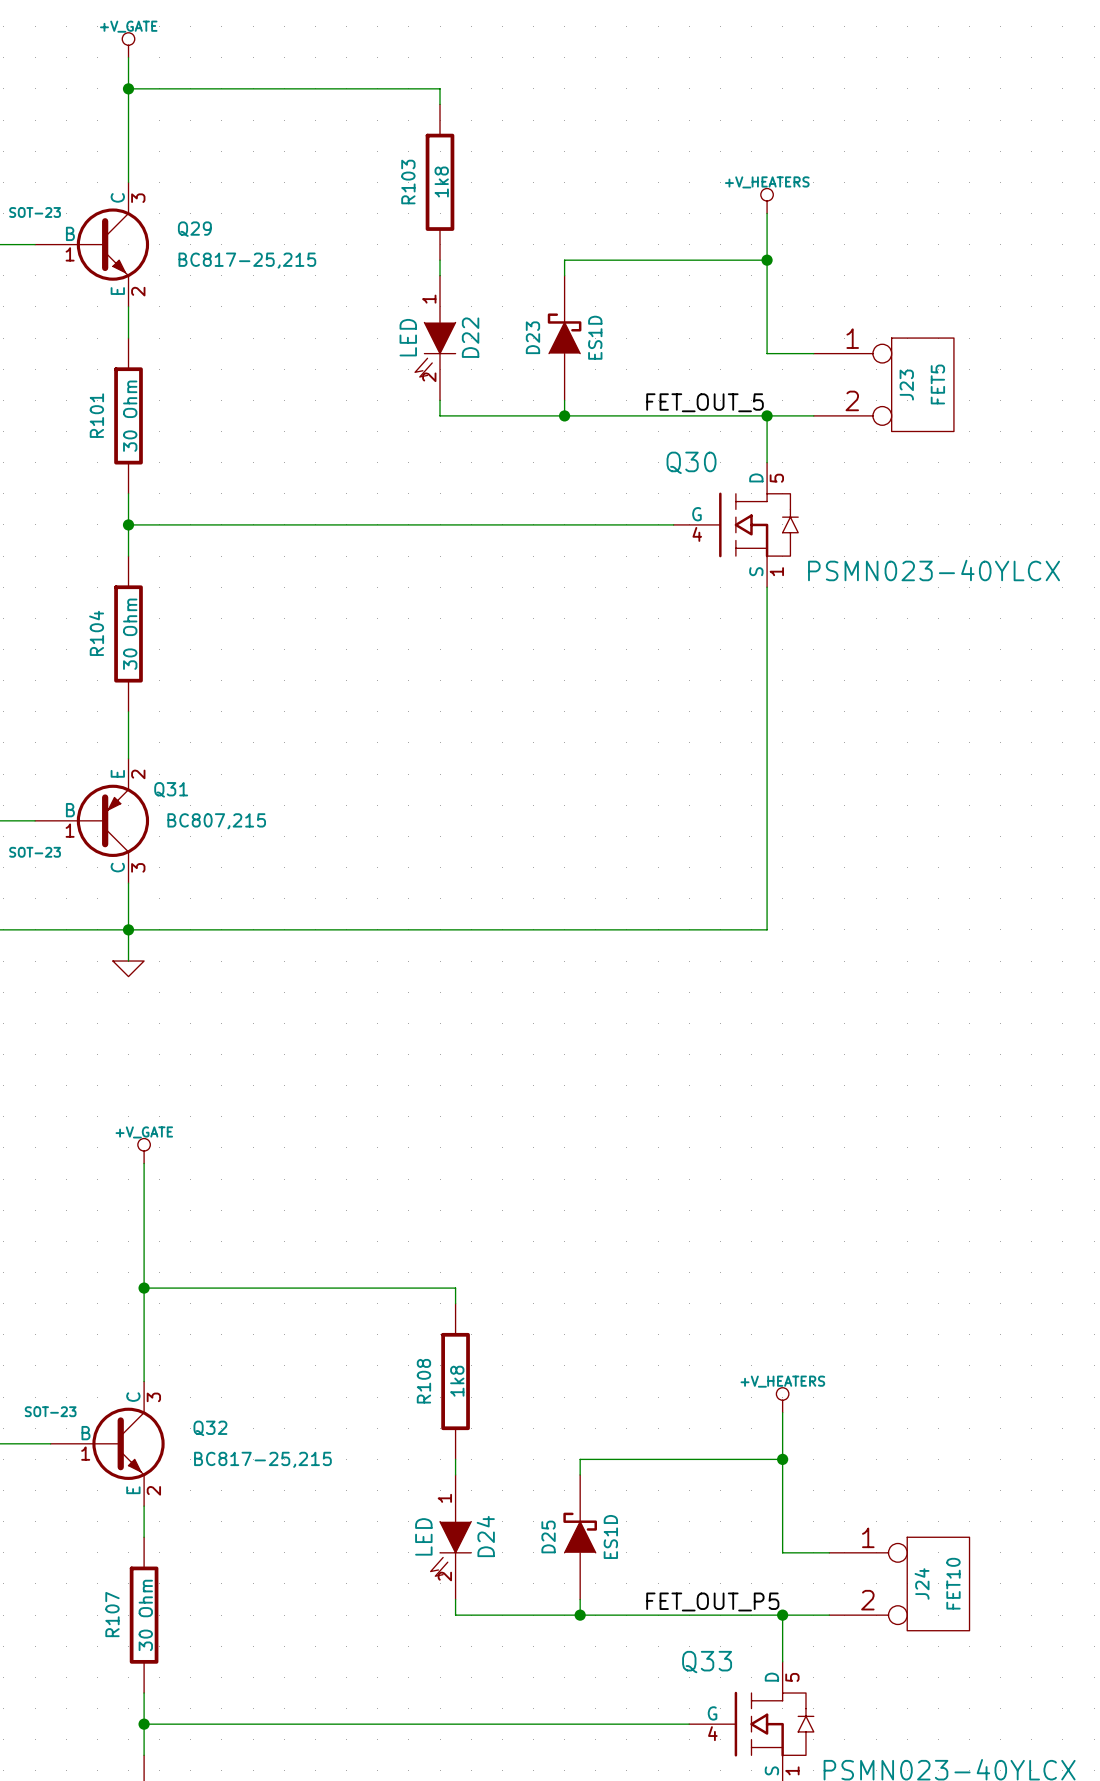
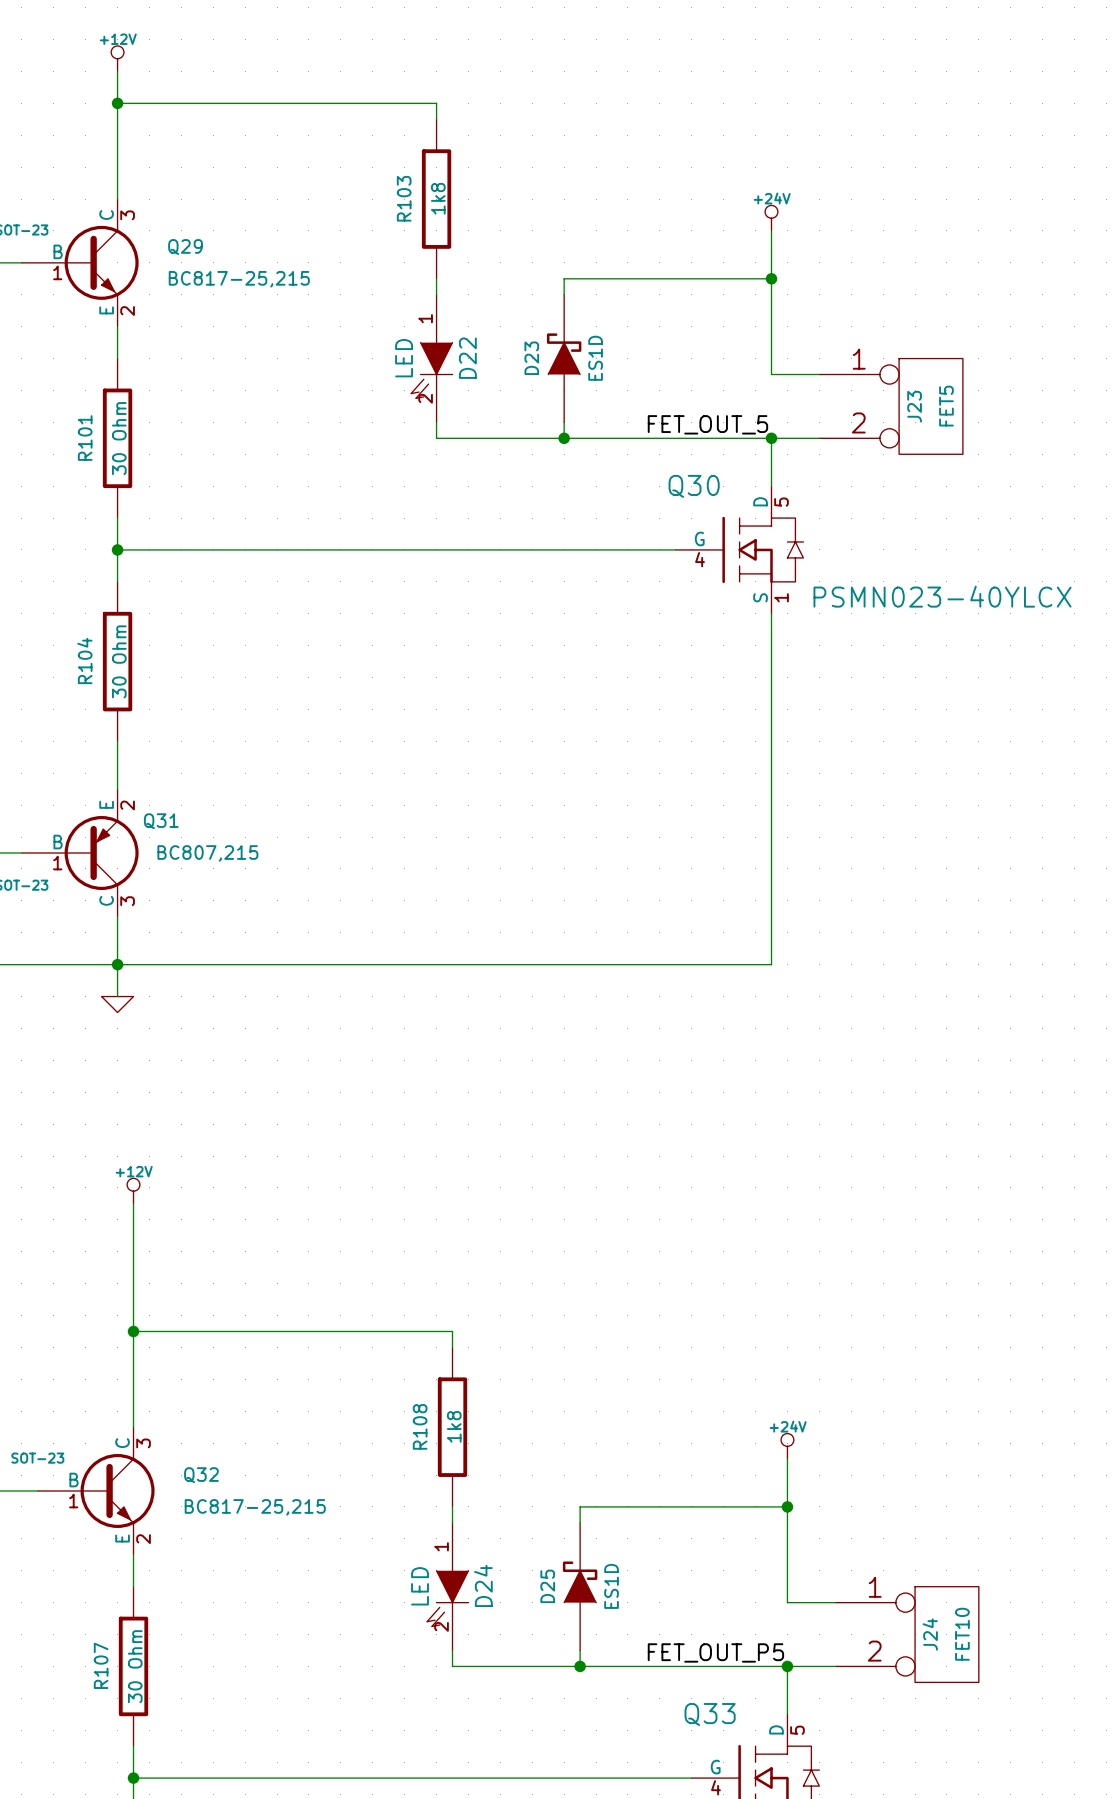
power symbol: +V_GATE (128, 45) -> +12V (117, 58)
power symbol: +V_HEATERS (767, 200) -> +24V (771, 218)
power symbol: +V_GATE (144, 1151) -> +12V (133, 1191)
power symbol: +V_HEATERS (782, 1400) -> +24V (787, 1446)

